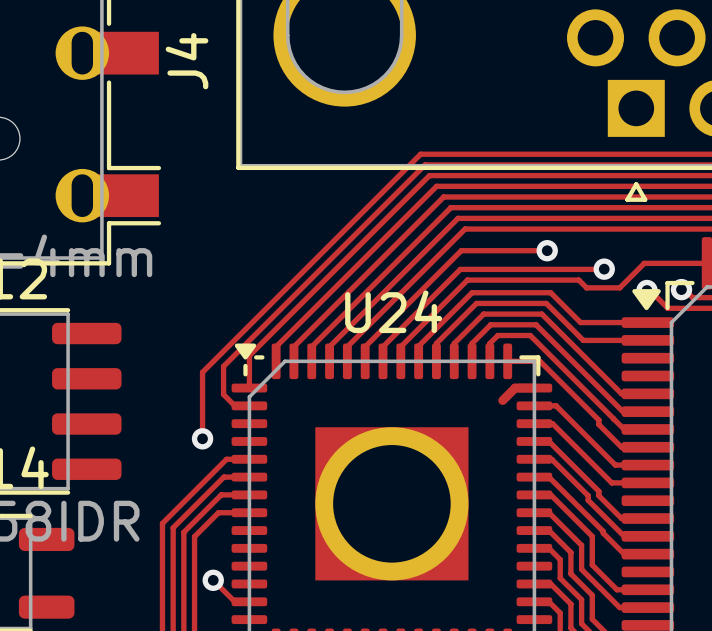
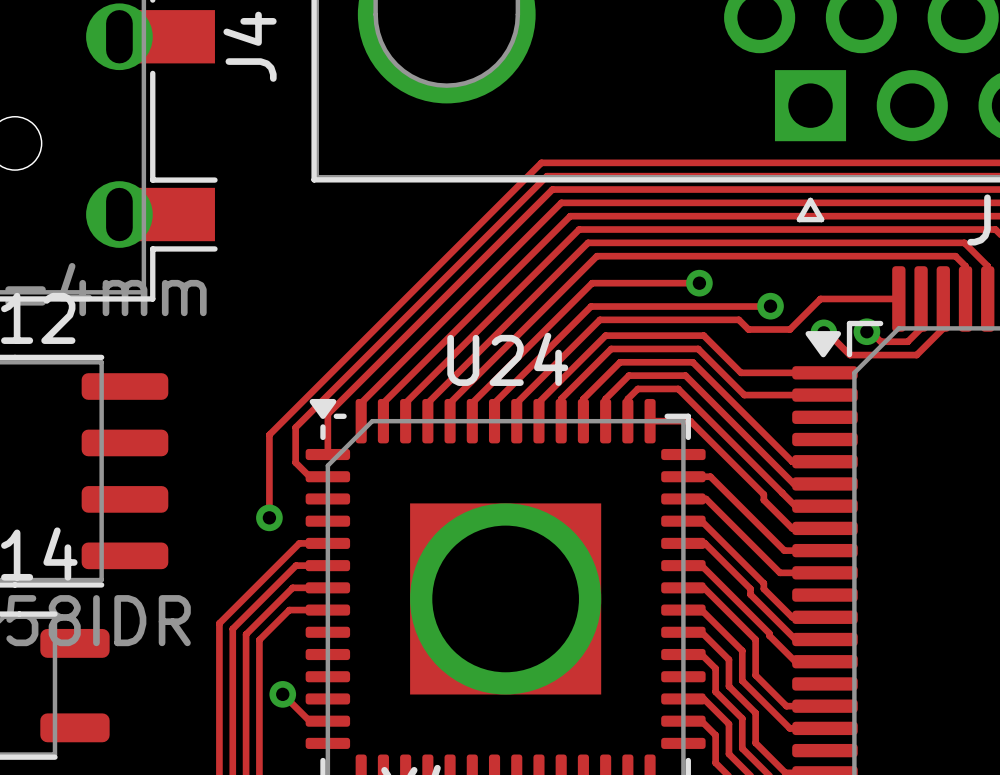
track: (534, 388) (515, 388) (502, 400) -> none

